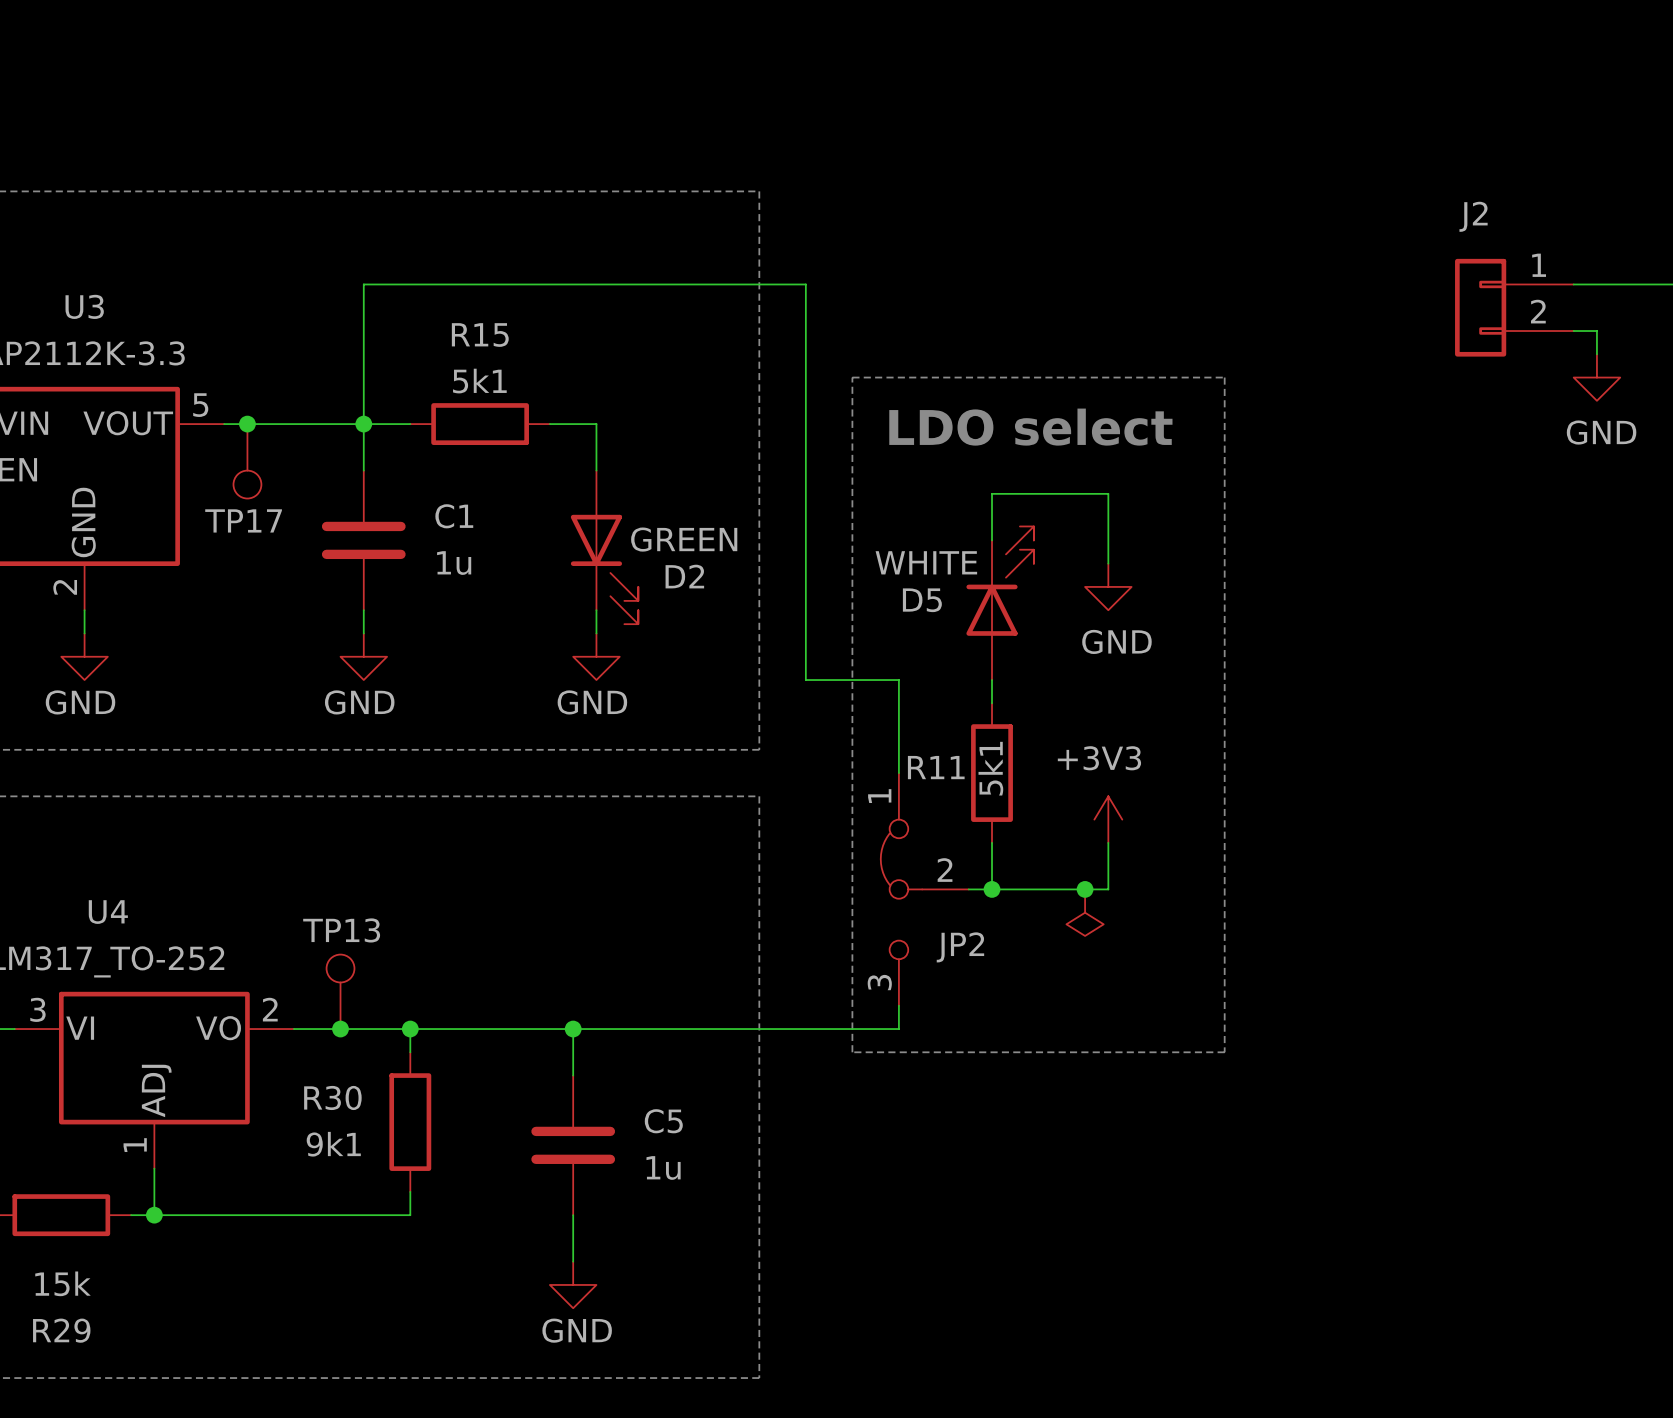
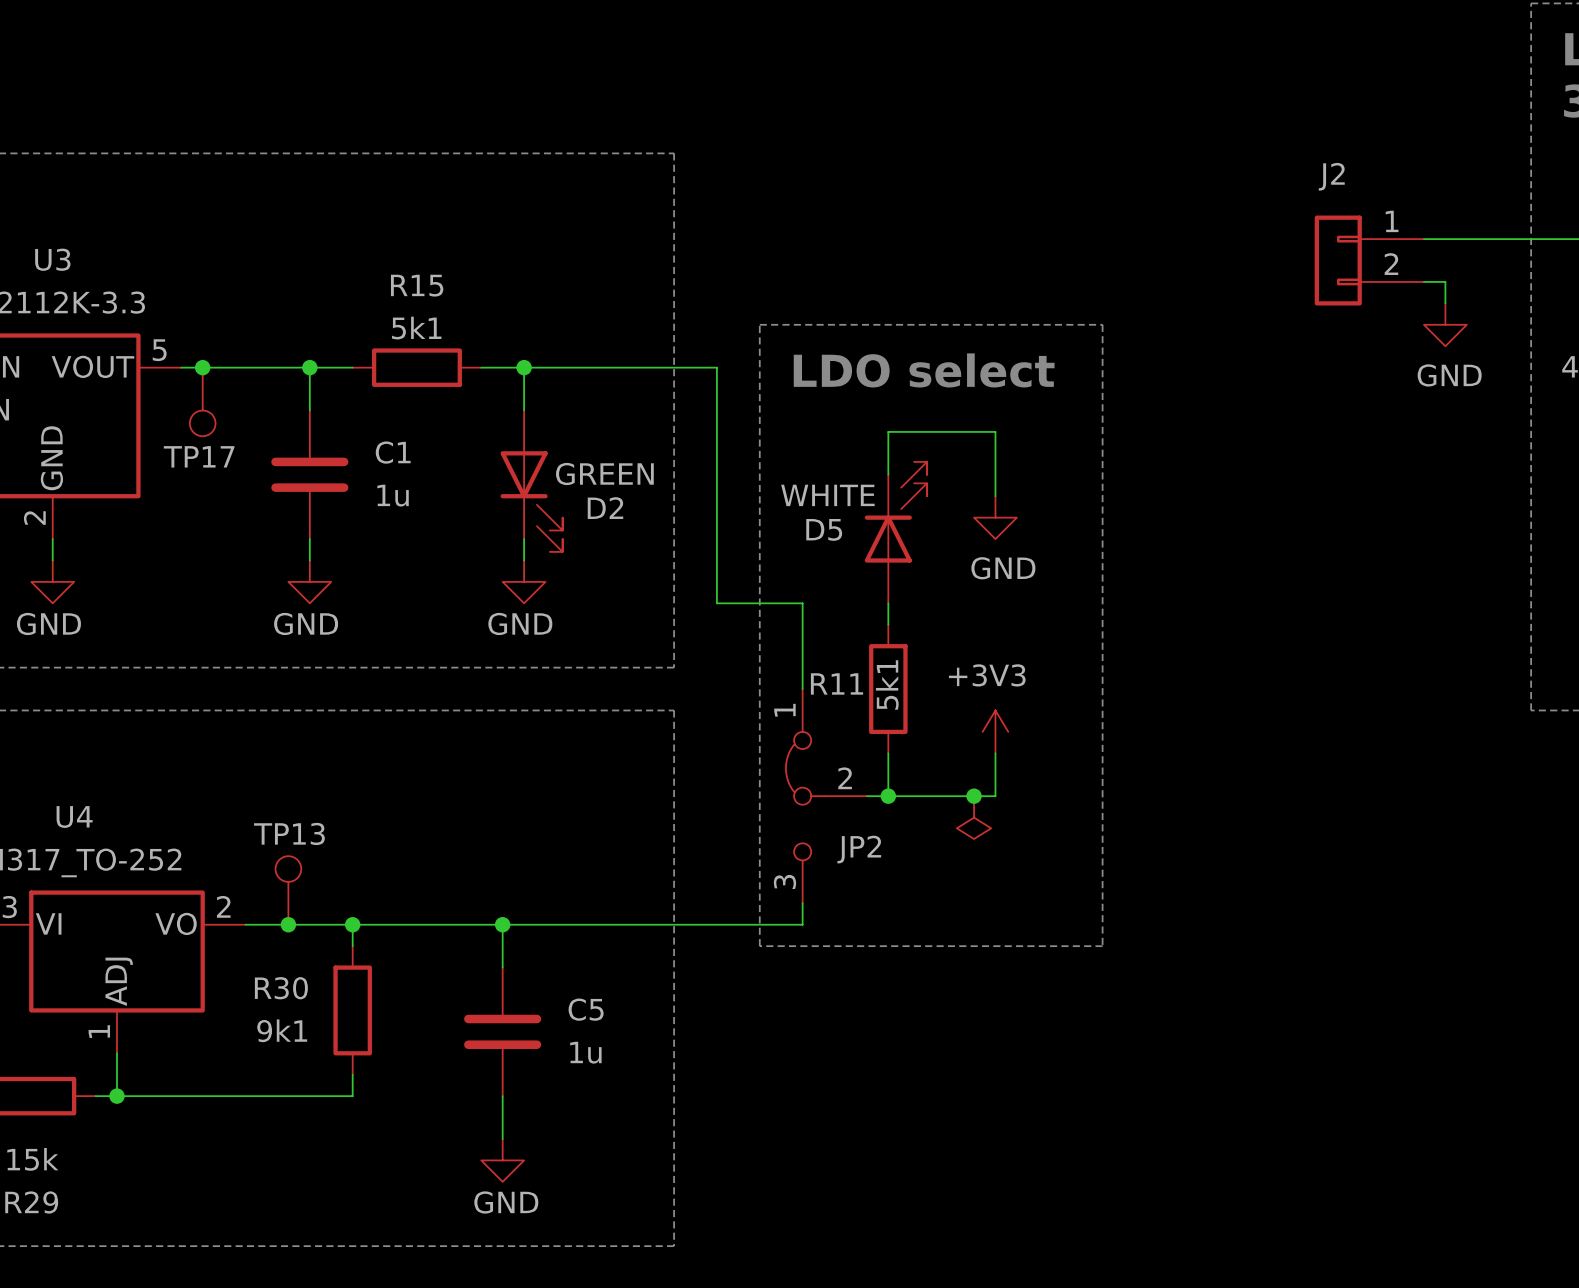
wire: (363, 424) (363, 284) (805, 284) (805, 424) -> (524, 367) (716, 367)
junction: none -> (524, 367)

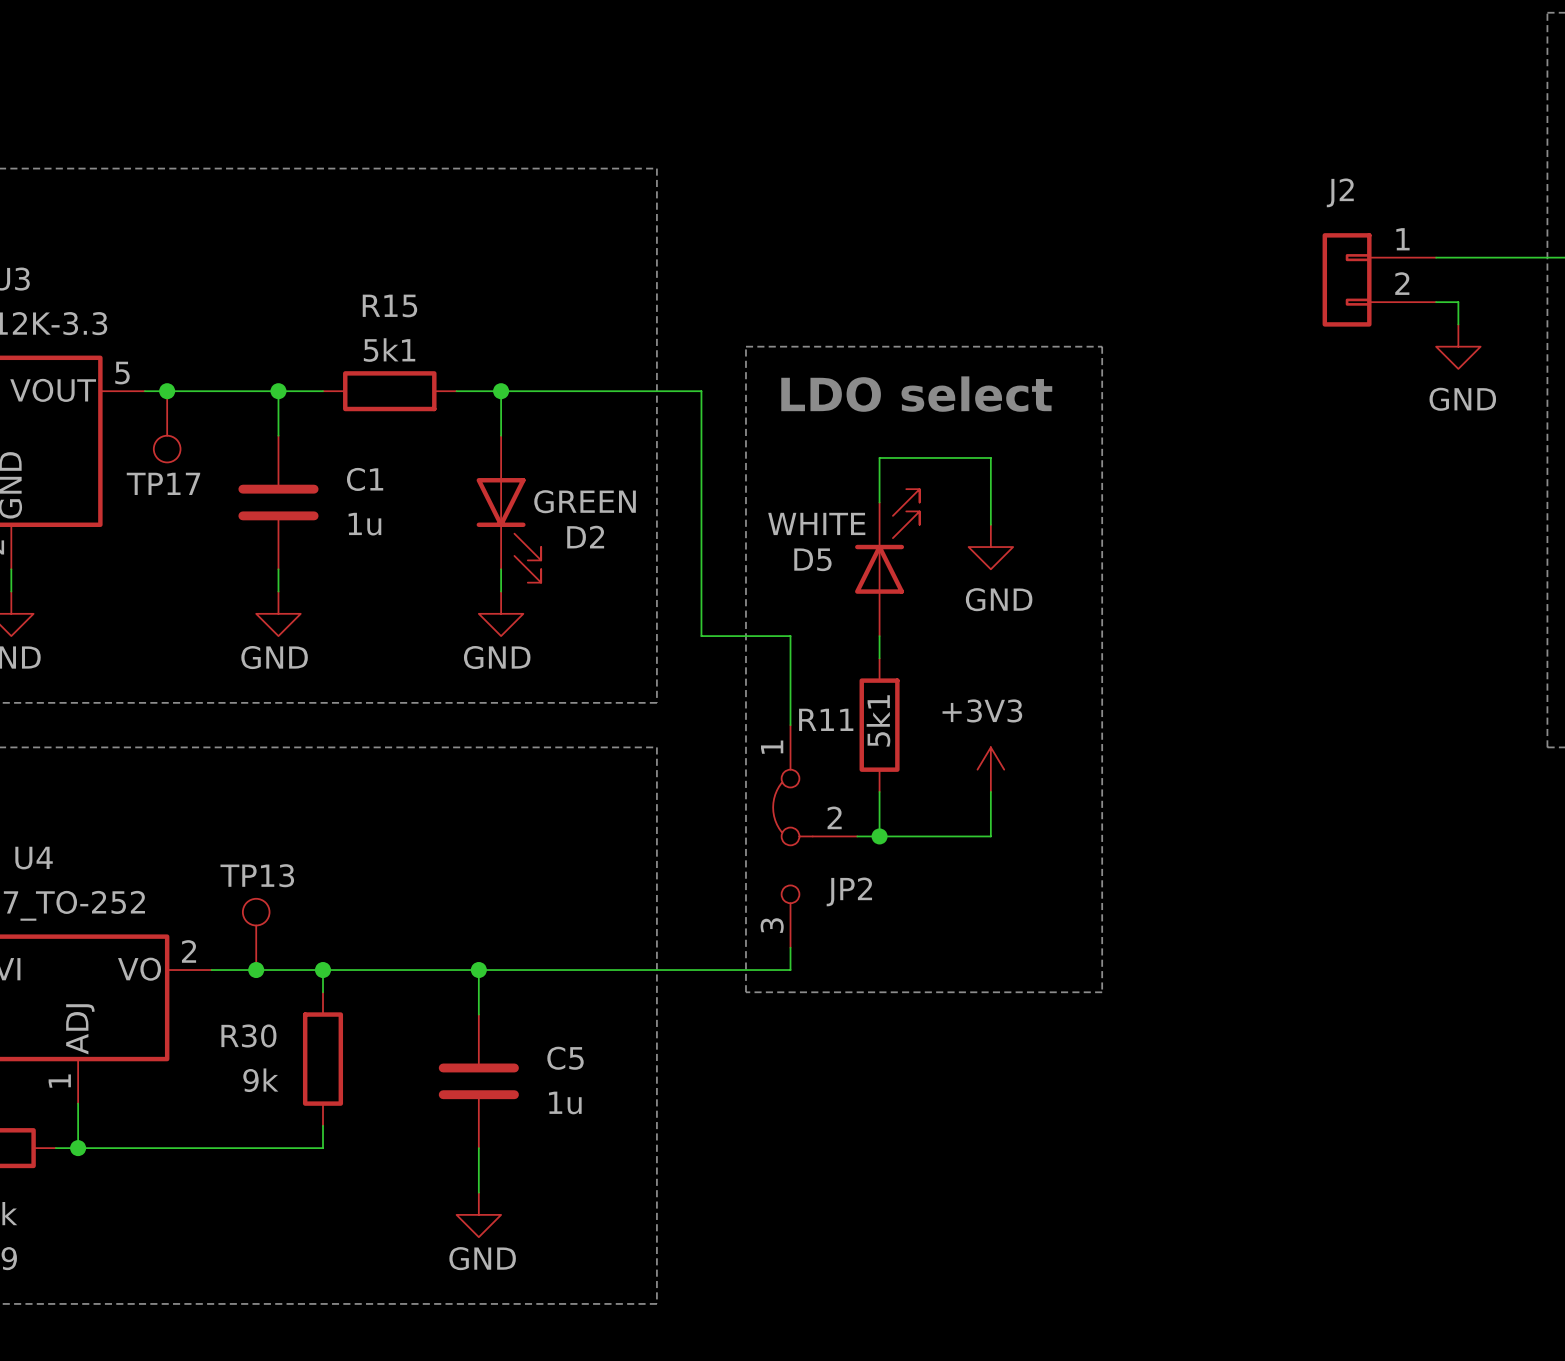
junction: (974, 796) -> none
power symbol: (974, 817) -> none
R30 value: 9k1 (282, 1030) -> 9k (260, 1080)

